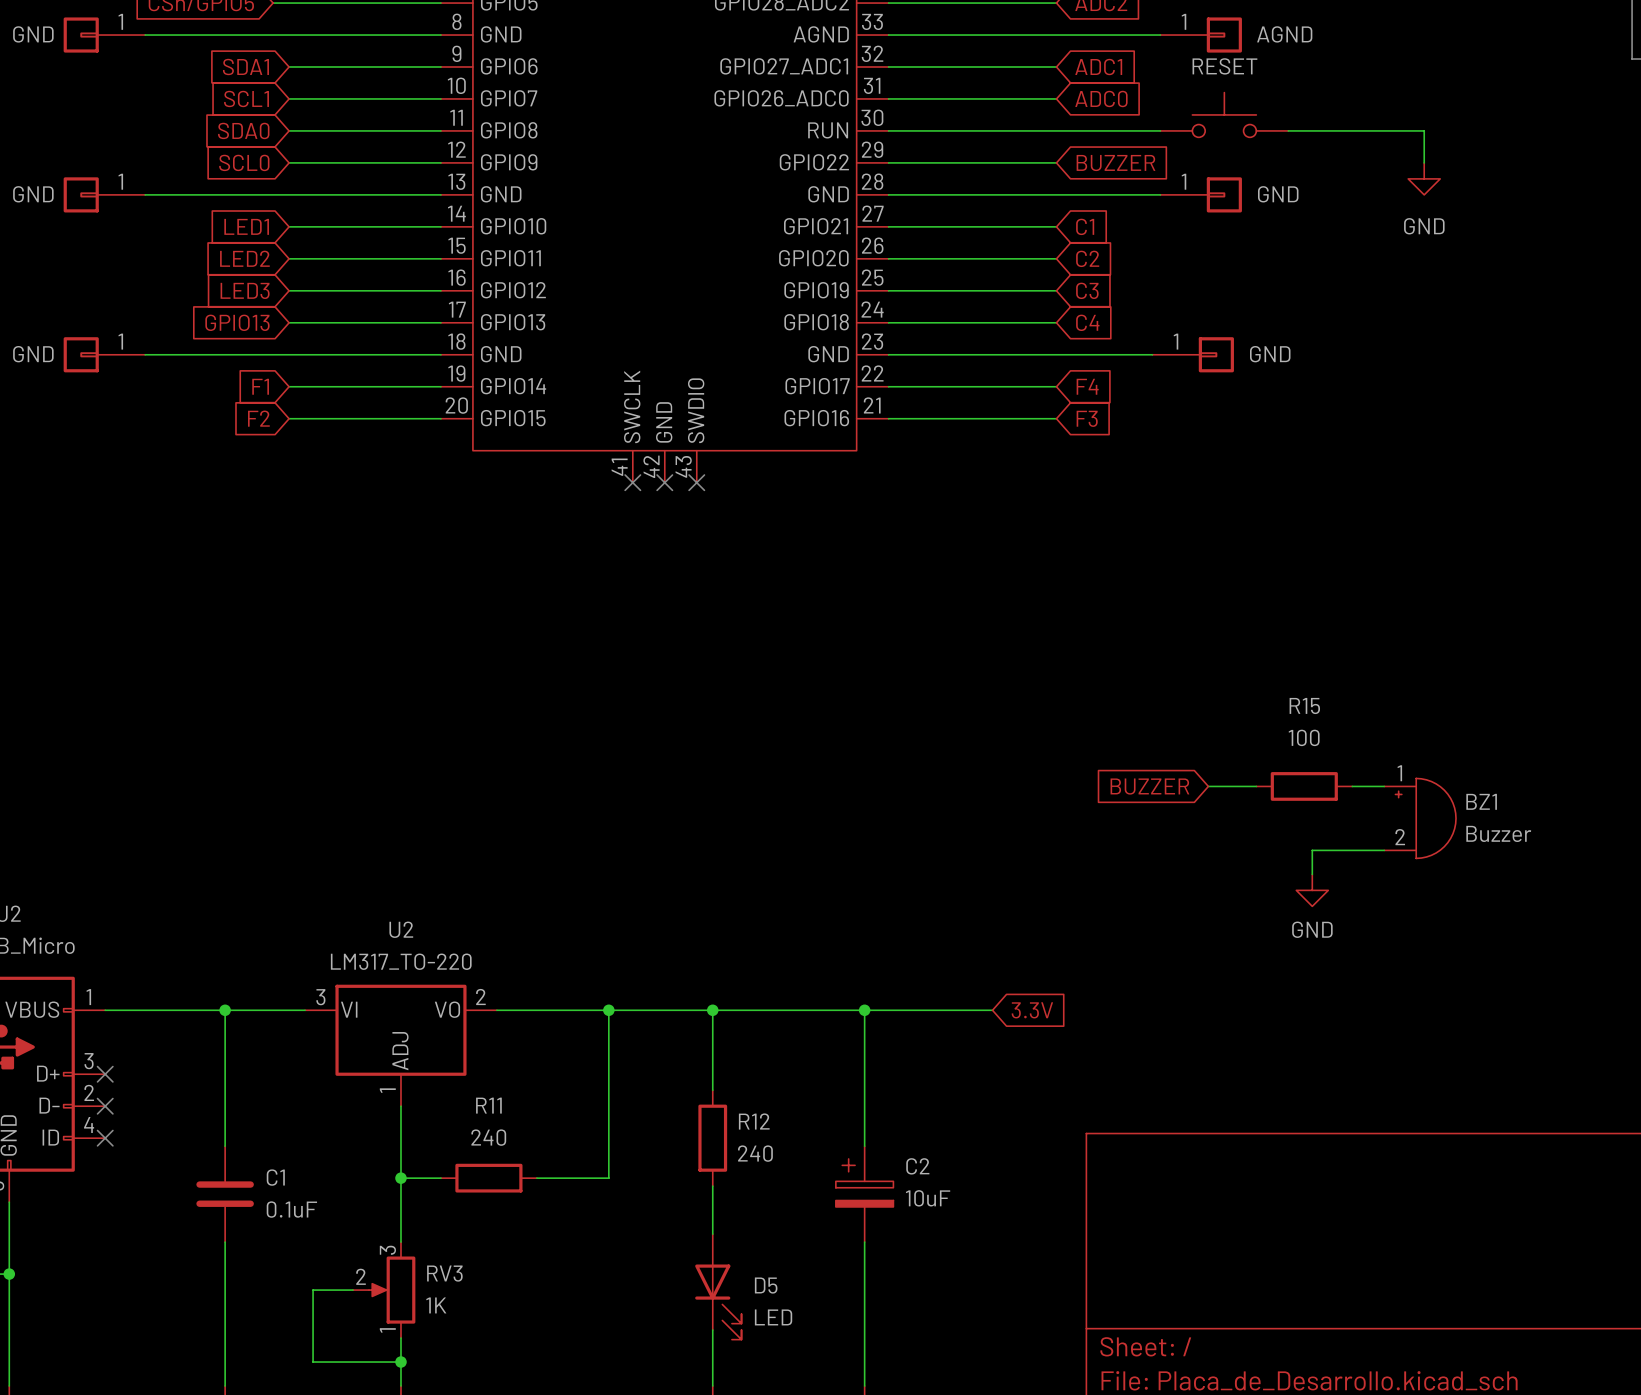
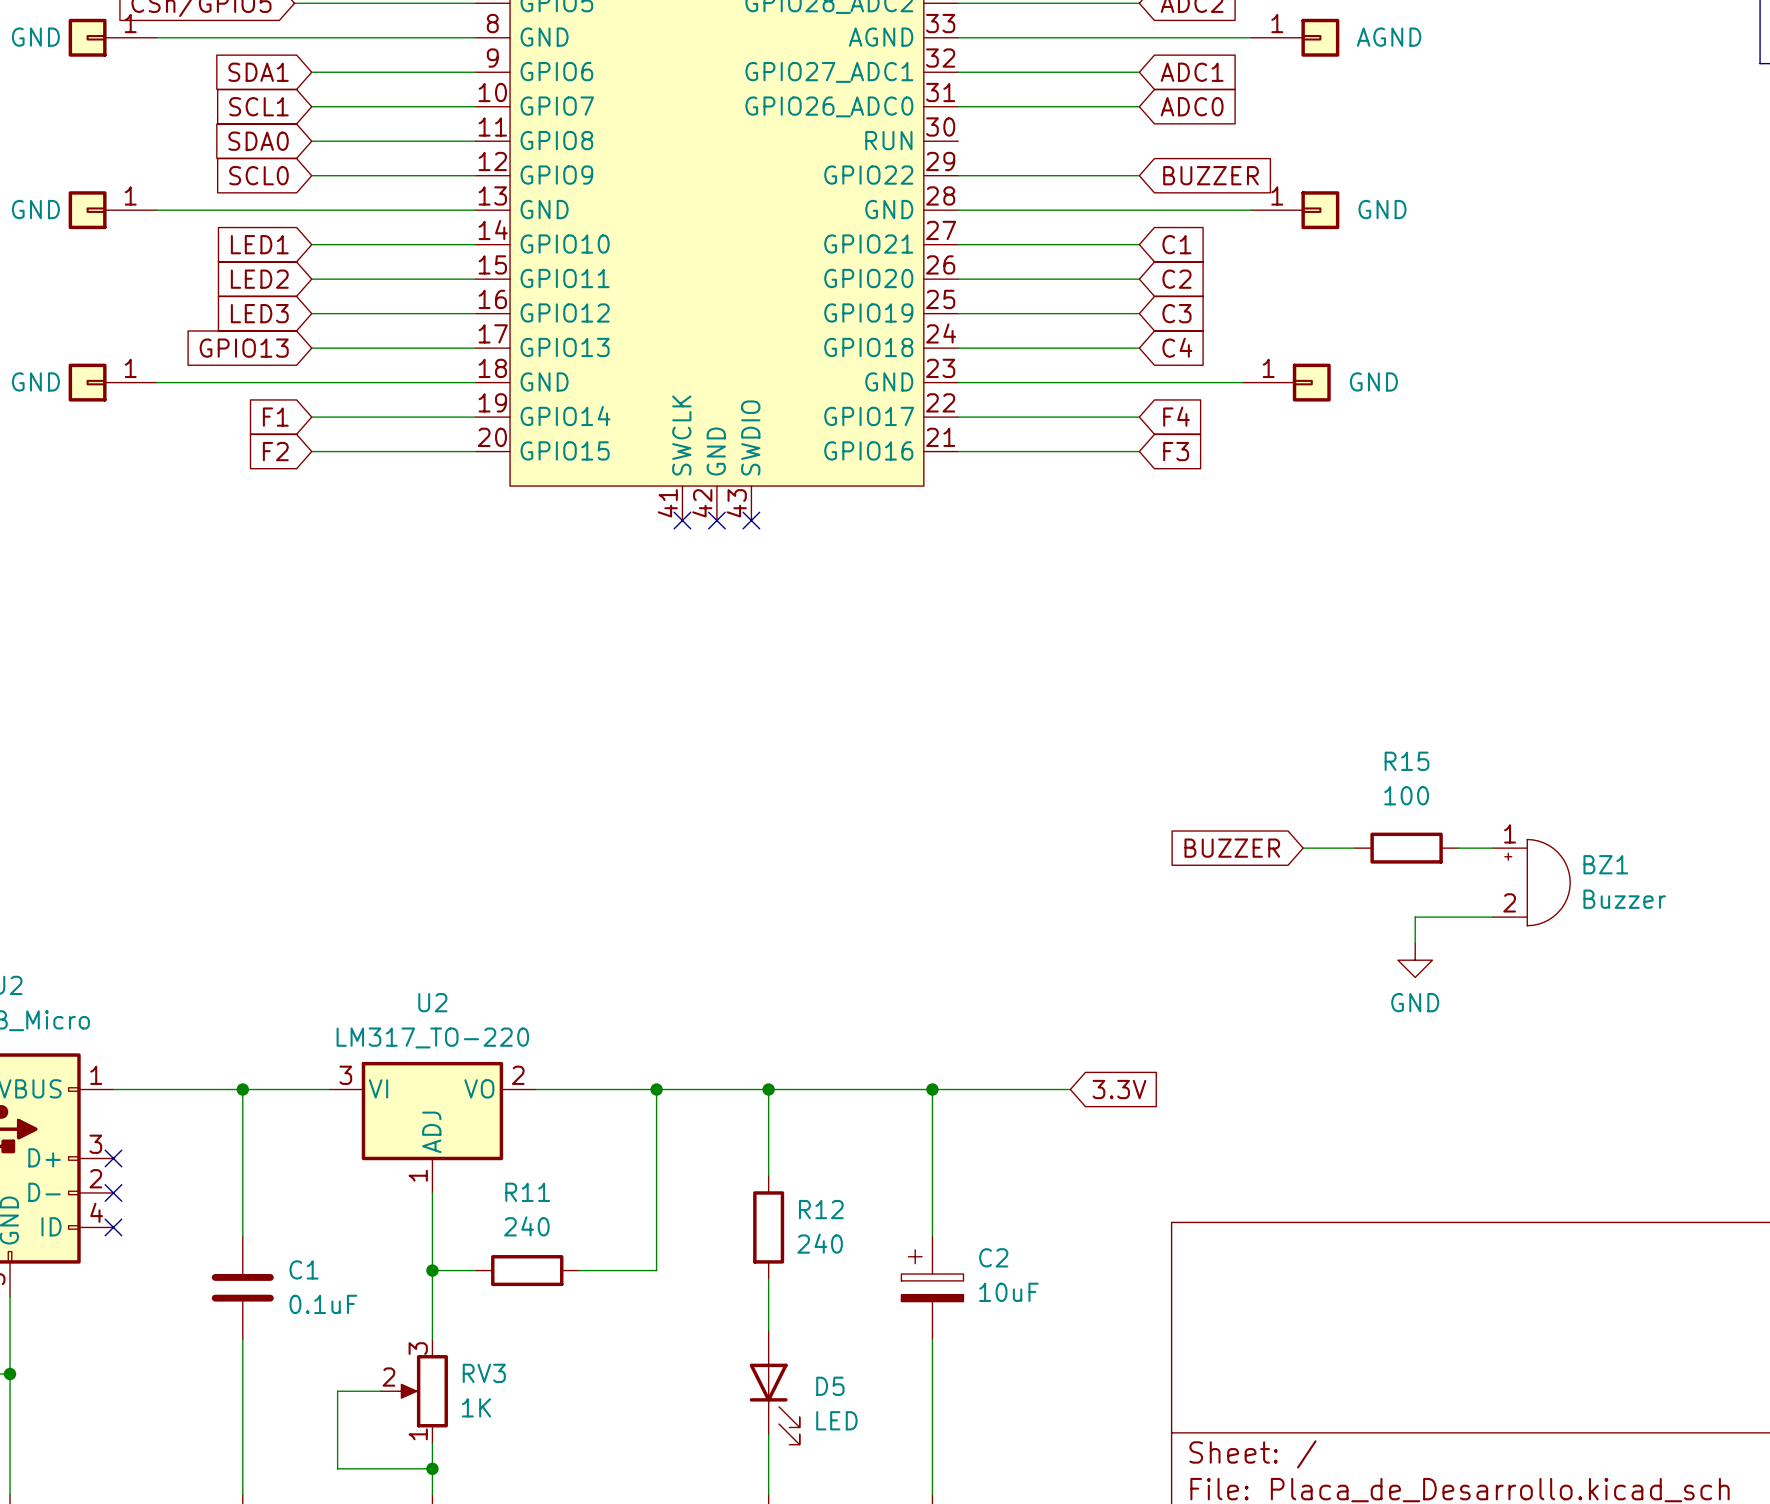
part: RESET (1224, 114) -> none
wire: (888, 130) (1160, 130) -> none
wire: (1288, 130) (1424, 130) (1424, 162) -> none
power symbol: GND (1424, 178) -> none

